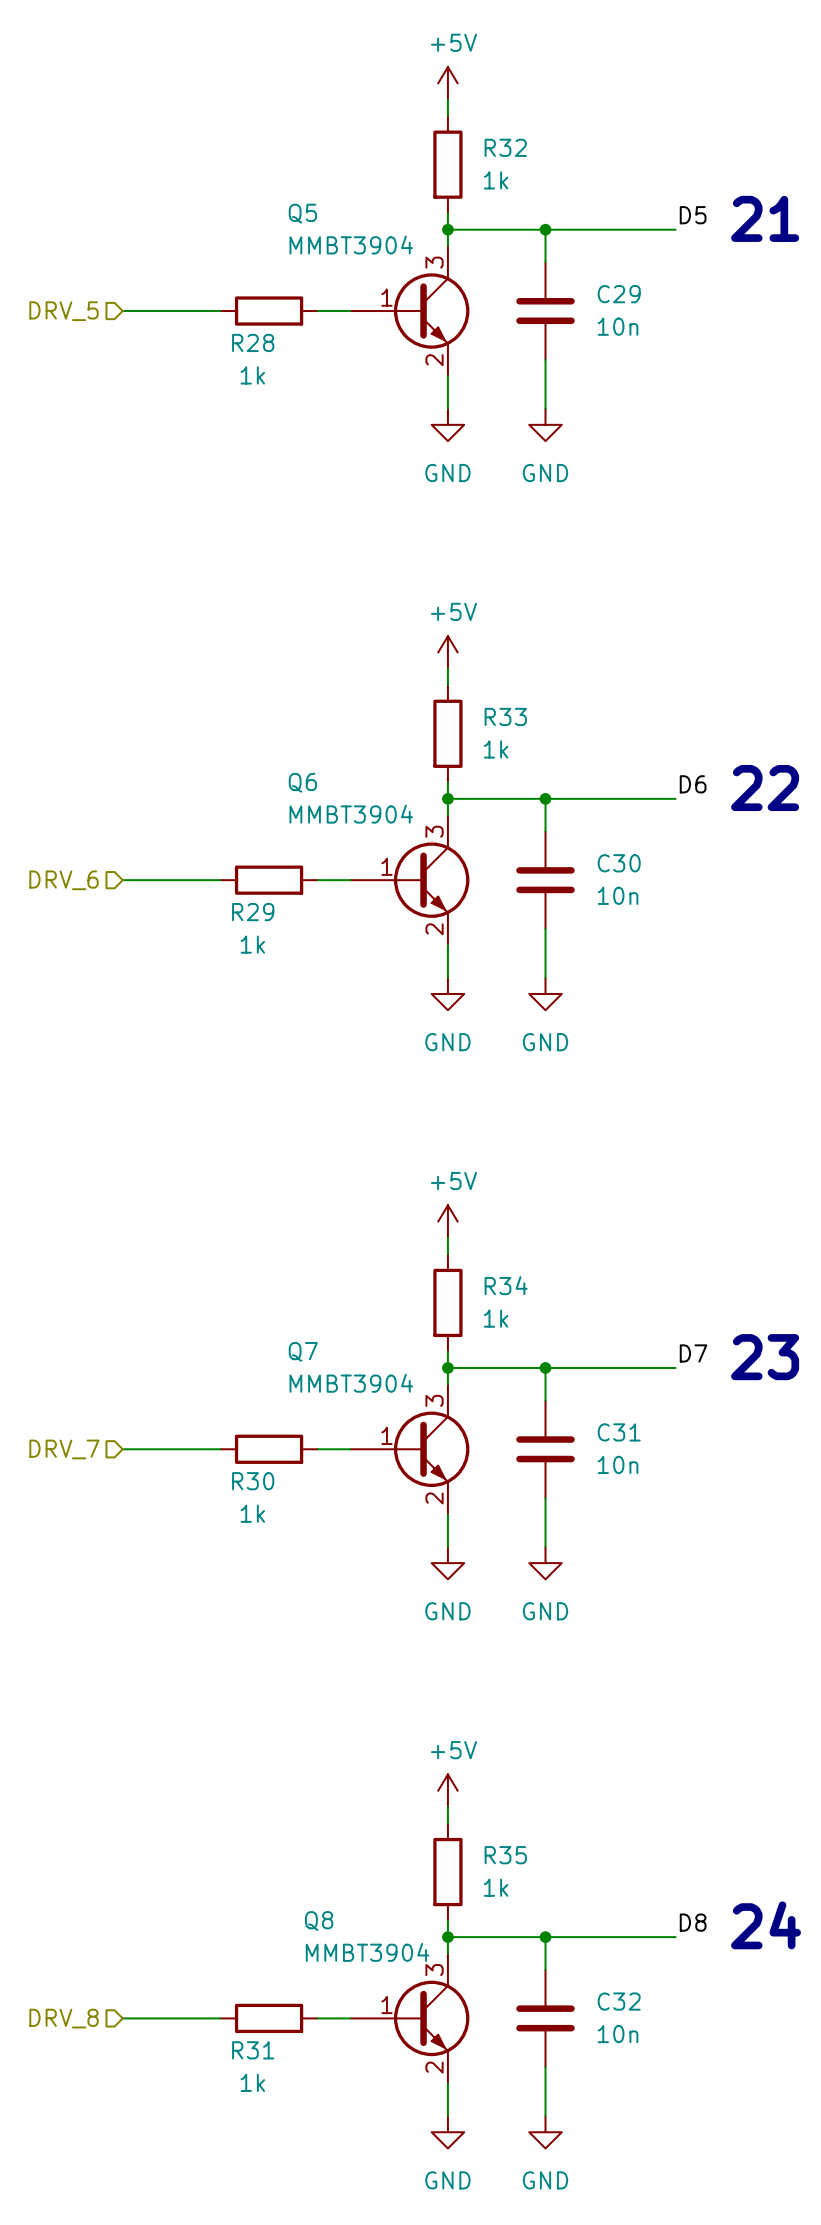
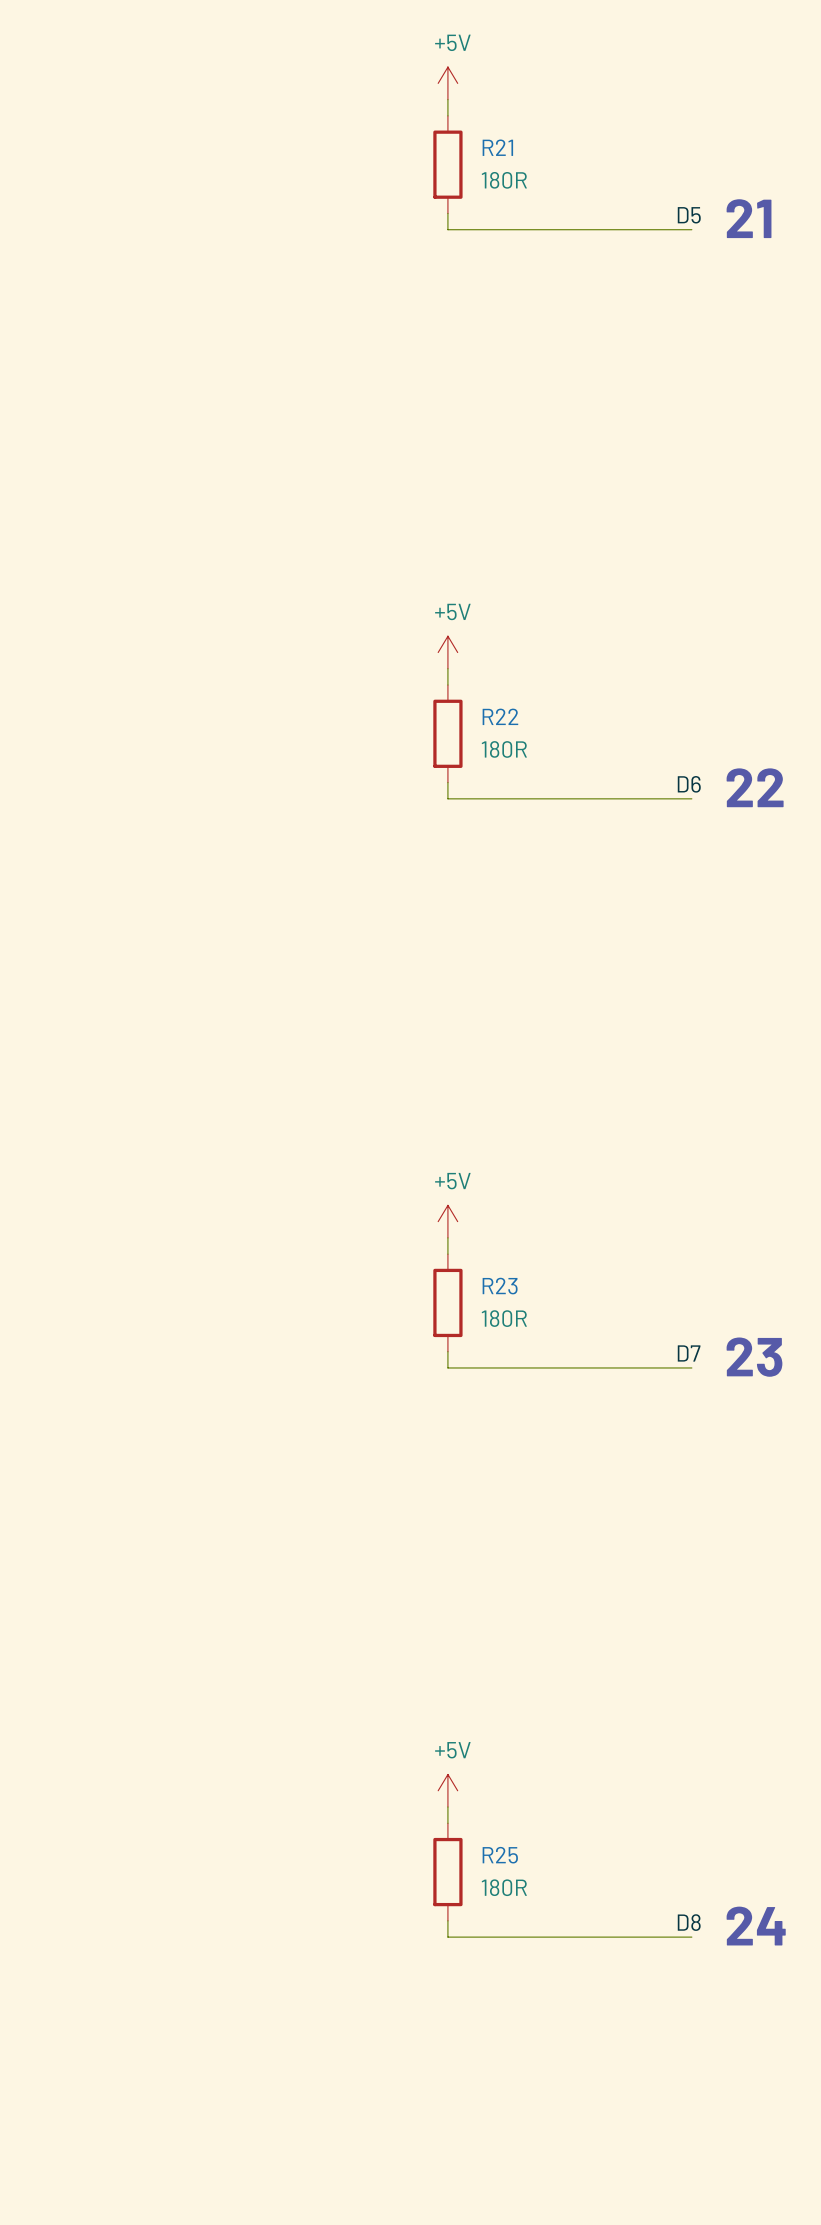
R32 name: R32 (505, 147) -> R21 (497, 147)
R32 value: 1k (496, 180) -> 180R (504, 180)
wire: (447, 229) (447, 245) -> none
junction: (447, 229) -> none
wire: (545, 229) (545, 262) -> none
junction: (545, 229) -> none
wire: none -> (675, 229) (691, 229)
hierarchical label: DRV_5 (64, 311) -> none
wire: (122, 311) (220, 311) -> none
R28: 1k (269, 311) -> none
wire: (317, 311) (350, 311) -> none
Q5: MMBT3904 (409, 311) -> none
C29: 10n (545, 311) -> none
wire: (545, 359) (545, 408) -> none
wire: (447, 376) (447, 408) -> none
power symbol: GND (447, 424) -> none
power symbol: GND (545, 424) -> none
R33 name: R33 (505, 716) -> R22 (500, 716)
R33 value: 1k (496, 749) -> 180R (504, 749)
wire: (447, 798) (447, 815) -> none
junction: (447, 798) -> none
wire: (545, 798) (545, 831) -> none
junction: (545, 798) -> none
wire: none -> (675, 798) (691, 798)
hierarchical label: DRV_6 (64, 880) -> none
wire: (122, 880) (220, 880) -> none
R29: 1k (269, 880) -> none
wire: (317, 880) (350, 880) -> none
Q6: MMBT3904 (409, 880) -> none
C30: 10n (545, 880) -> none
wire: (545, 928) (545, 977) -> none
wire: (447, 945) (447, 977) -> none
power symbol: GND (447, 993) -> none
power symbol: GND (545, 993) -> none
R34 name: R34 (506, 1285) -> R23 (500, 1286)
R34 value: 1k (496, 1318) -> 180R (504, 1318)
wire: (447, 1367) (447, 1384) -> none
junction: (447, 1367) -> none
wire: (545, 1367) (545, 1400) -> none
junction: (545, 1367) -> none
wire: none -> (675, 1367) (691, 1367)
hierarchical label: DRV_7 (64, 1449) -> none
wire: (122, 1449) (220, 1449) -> none
R30: 1k (269, 1449) -> none
wire: (317, 1449) (350, 1449) -> none
Q7: MMBT3904 (409, 1449) -> none
C31: 10n (545, 1449) -> none
wire: (545, 1498) (545, 1546) -> none
wire: (447, 1514) (447, 1546) -> none
power symbol: GND (447, 1563) -> none
power symbol: GND (545, 1563) -> none
R35 name: R35 (505, 1855) -> R25 (500, 1855)
R35 value: 1k (496, 1887) -> 180R (504, 1887)
wire: (447, 1937) (447, 1953) -> none
junction: (447, 1937) -> none
wire: (545, 1937) (545, 1969) -> none
junction: (545, 1937) -> none
wire: none -> (675, 1937) (691, 1937)
hierarchical label: DRV_8 (64, 2018) -> none
wire: (122, 2018) (220, 2018) -> none
R31: 1k (269, 2018) -> none
wire: (317, 2018) (350, 2018) -> none
Q8: MMBT3904 (409, 2018) -> none
C32: 10n (545, 2018) -> none
wire: (545, 2067) (545, 2115) -> none
wire: (447, 2083) (447, 2115) -> none
power symbol: GND (447, 2132) -> none
power symbol: GND (545, 2132) -> none

